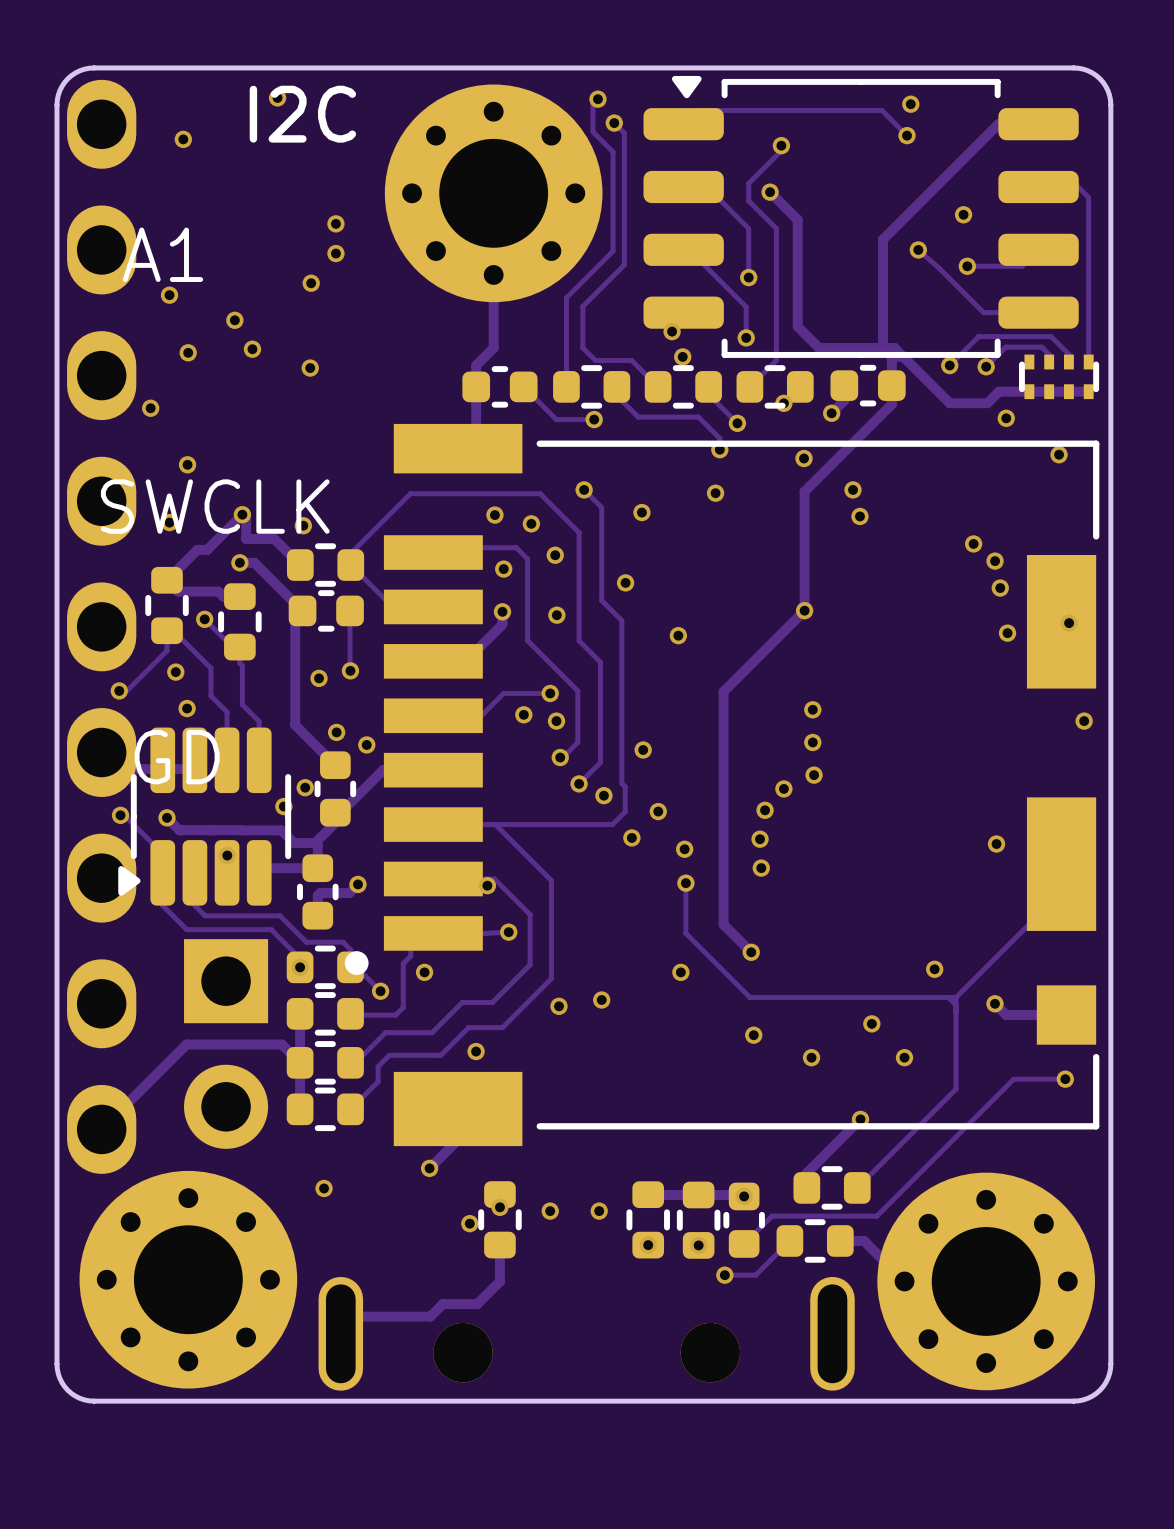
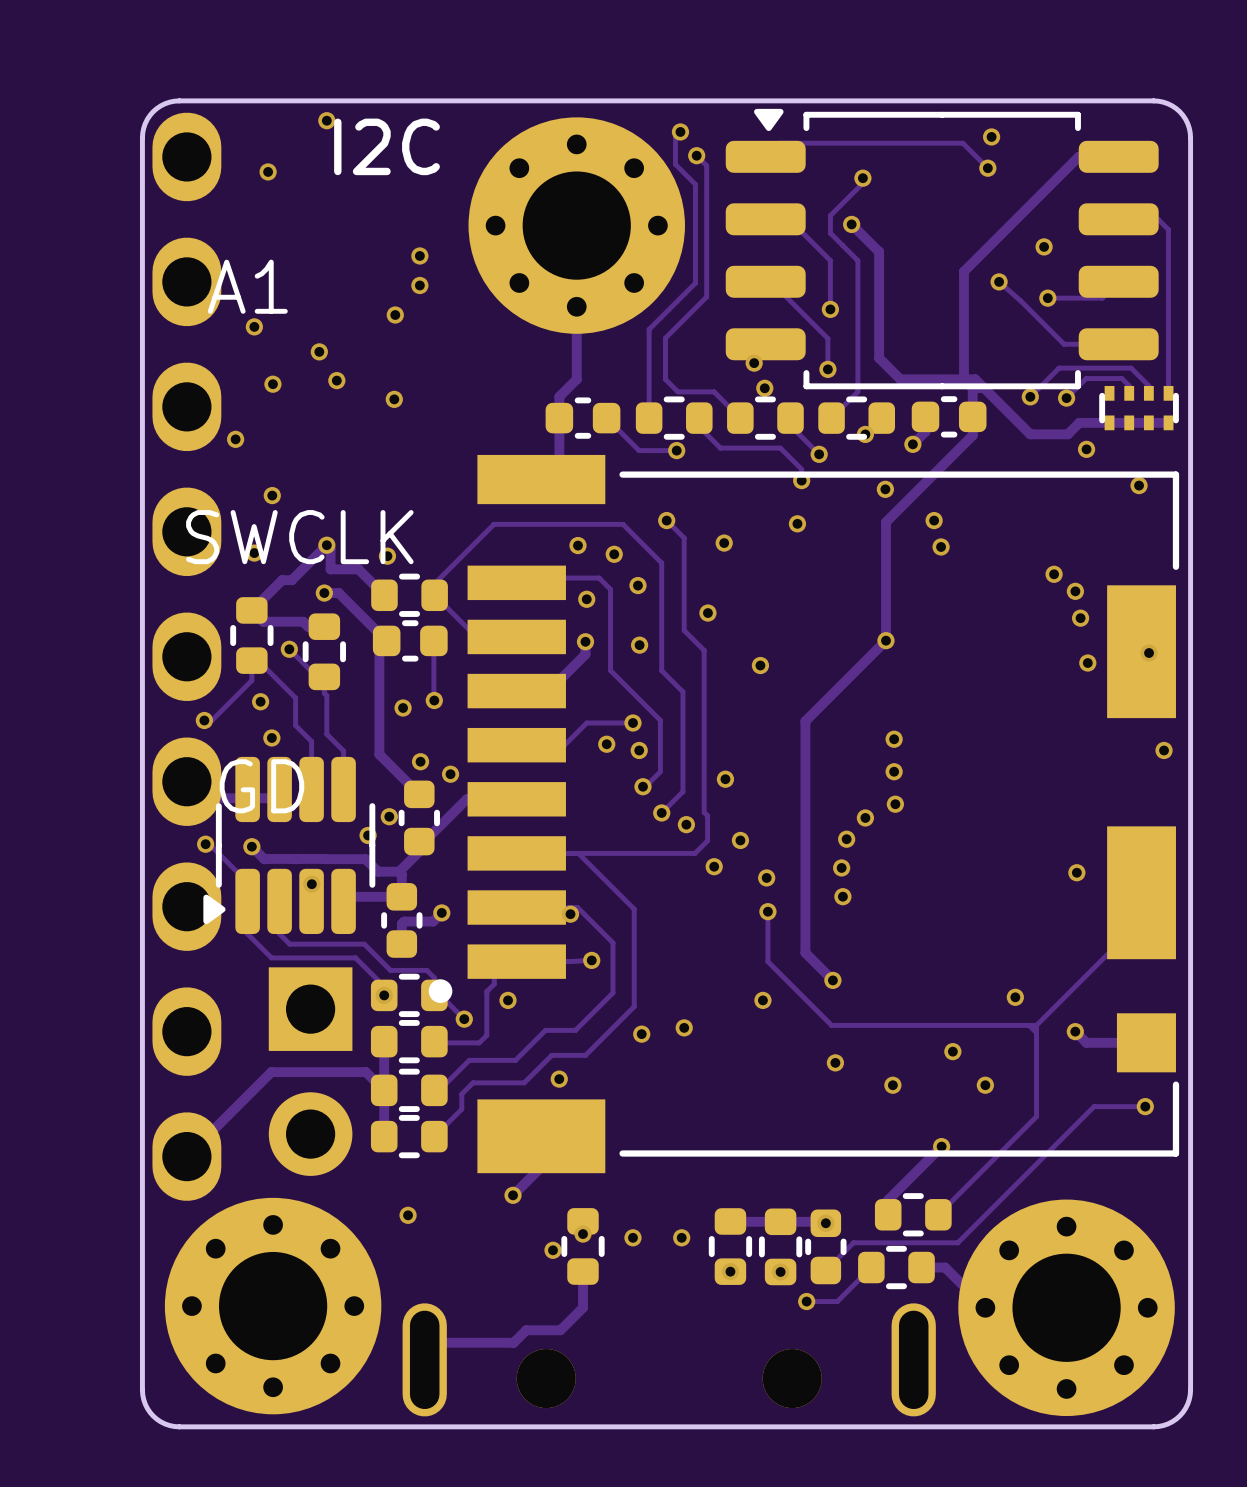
via position: (277, 97) -> (326, 120)

